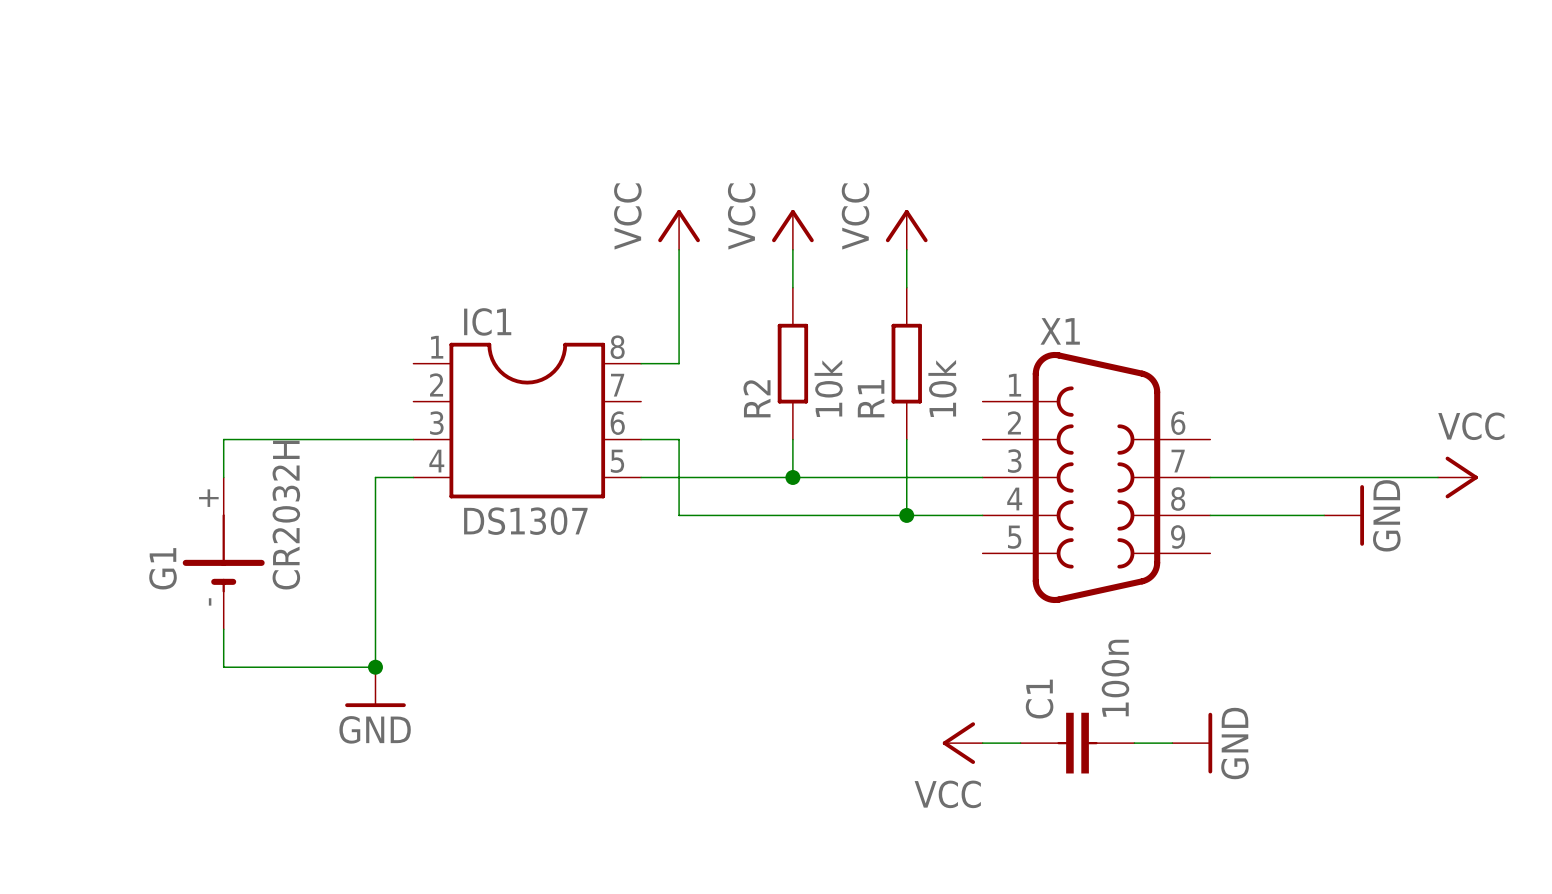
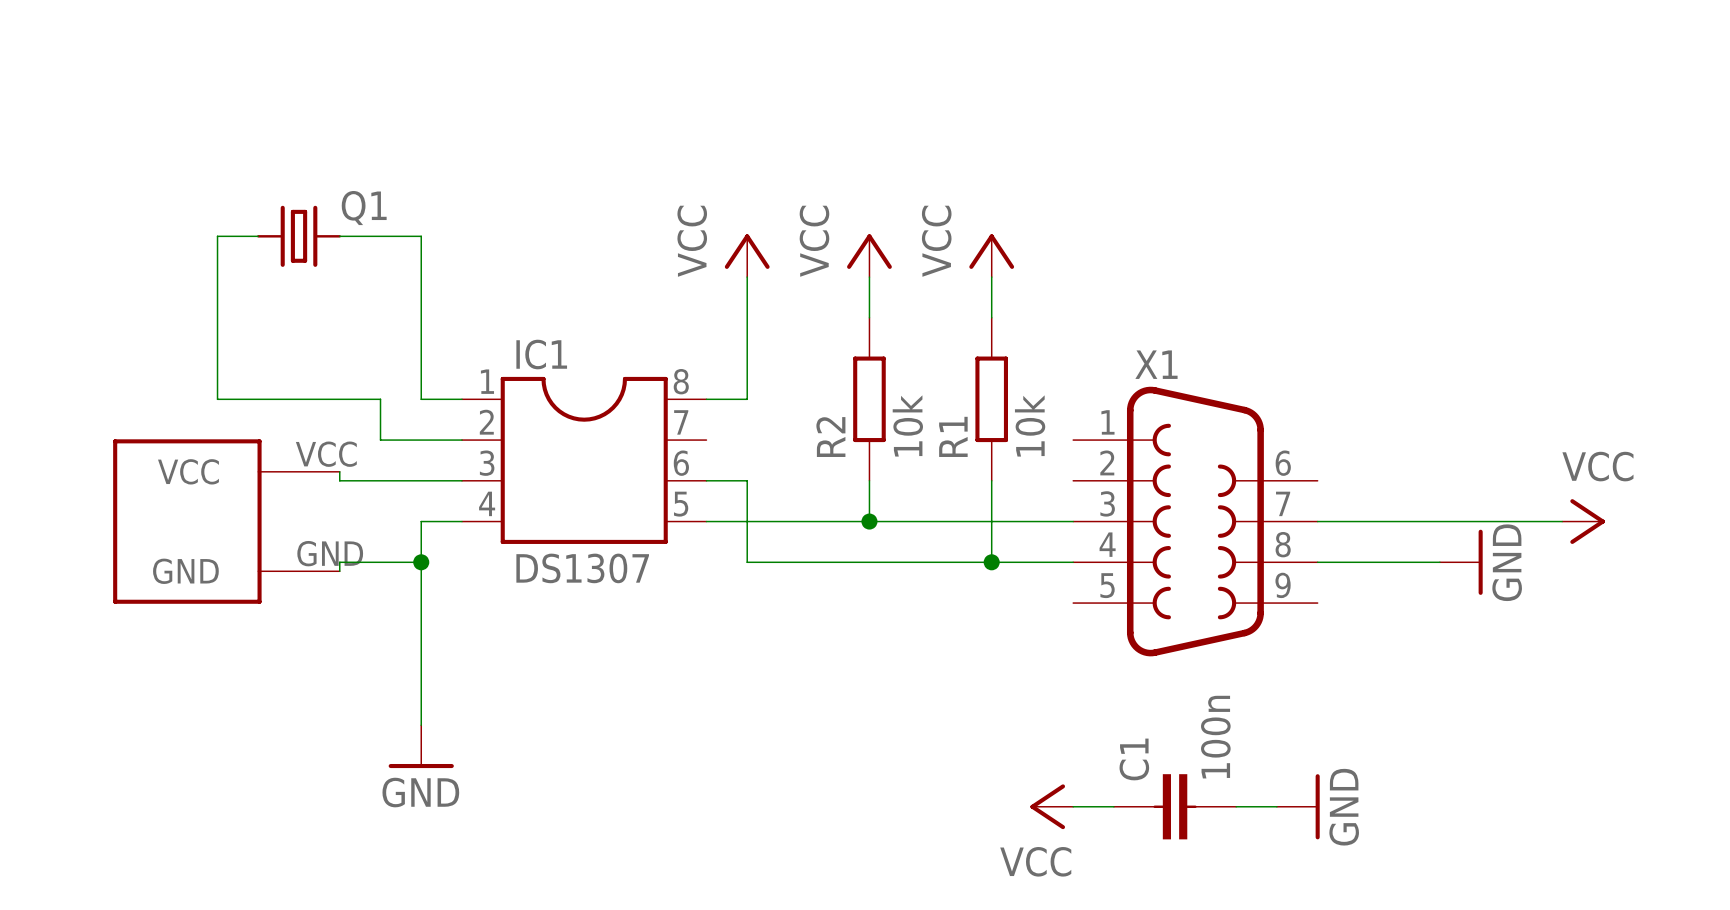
wire: none -> (258, 236) (217, 236) (217, 399) (380, 399) (380, 440) (462, 440)
Q1: none -> (299, 236)
wire: none -> (339, 236) (421, 236) (421, 399) (462, 399)
wire: (299, 439) (223, 439) (223, 477) -> (339, 480) (339, 471)
part: none -> (226, 521)
wire: none -> (421, 562) (339, 562) (339, 571)
junction: none -> (421, 562)
G1: CR2032H (223, 553) -> none
wire: (223, 629) (223, 667) (375, 667) -> none
junction: (375, 667) -> none

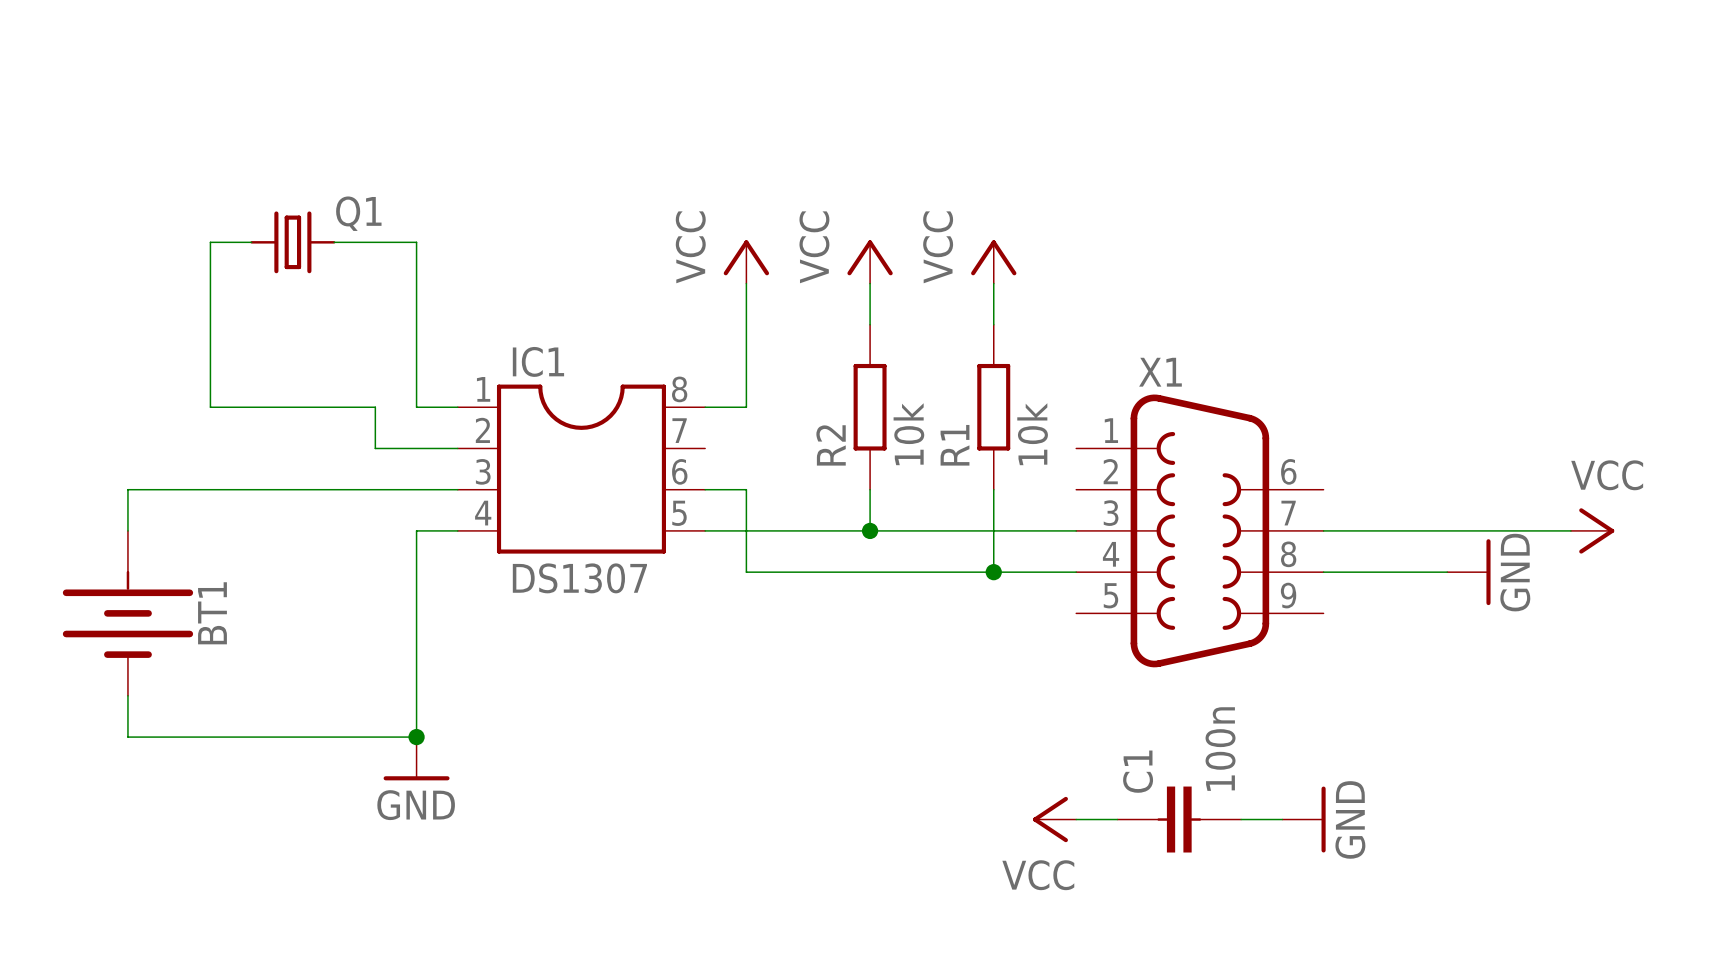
wire: (339, 471) (339, 480) -> (127, 530) (127, 489) (334, 489)
part: (226, 521) -> none
wire: (421, 562) (339, 562) (339, 571) -> none
junction: (421, 562) -> none
BT1: none -> (127, 613)
wire: none -> (127, 695) (127, 737) (416, 737)
junction: none -> (416, 737)

